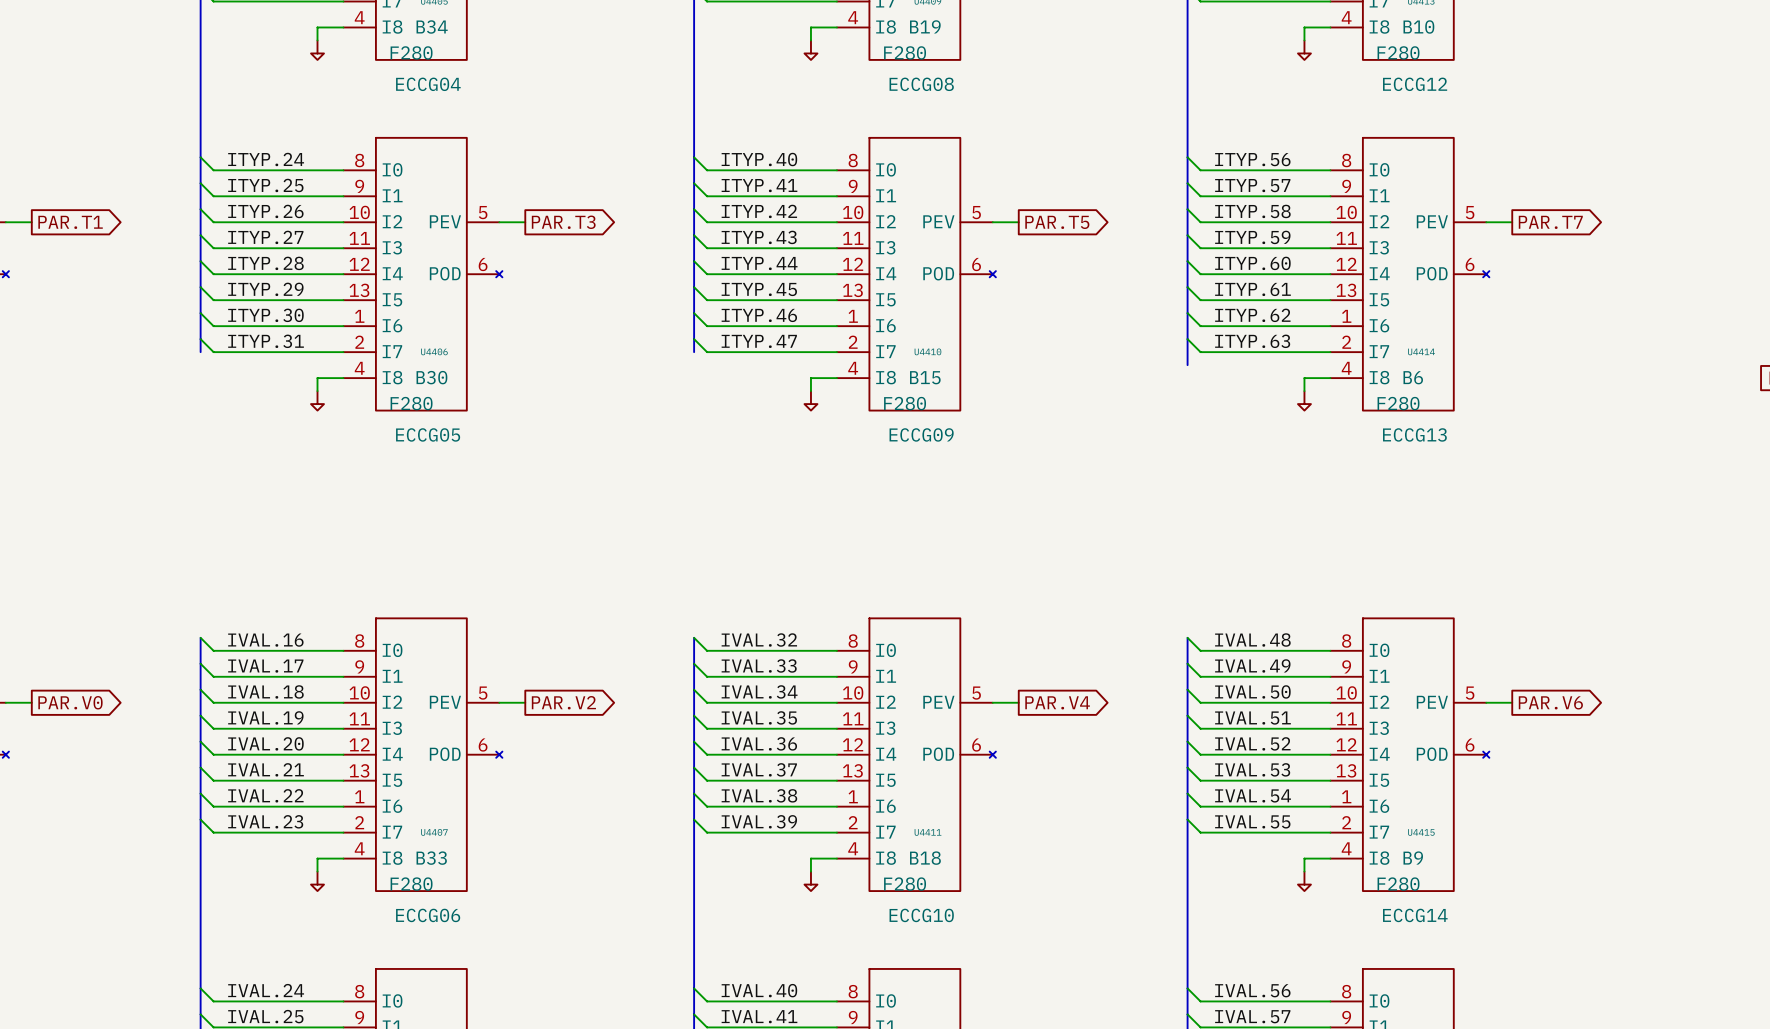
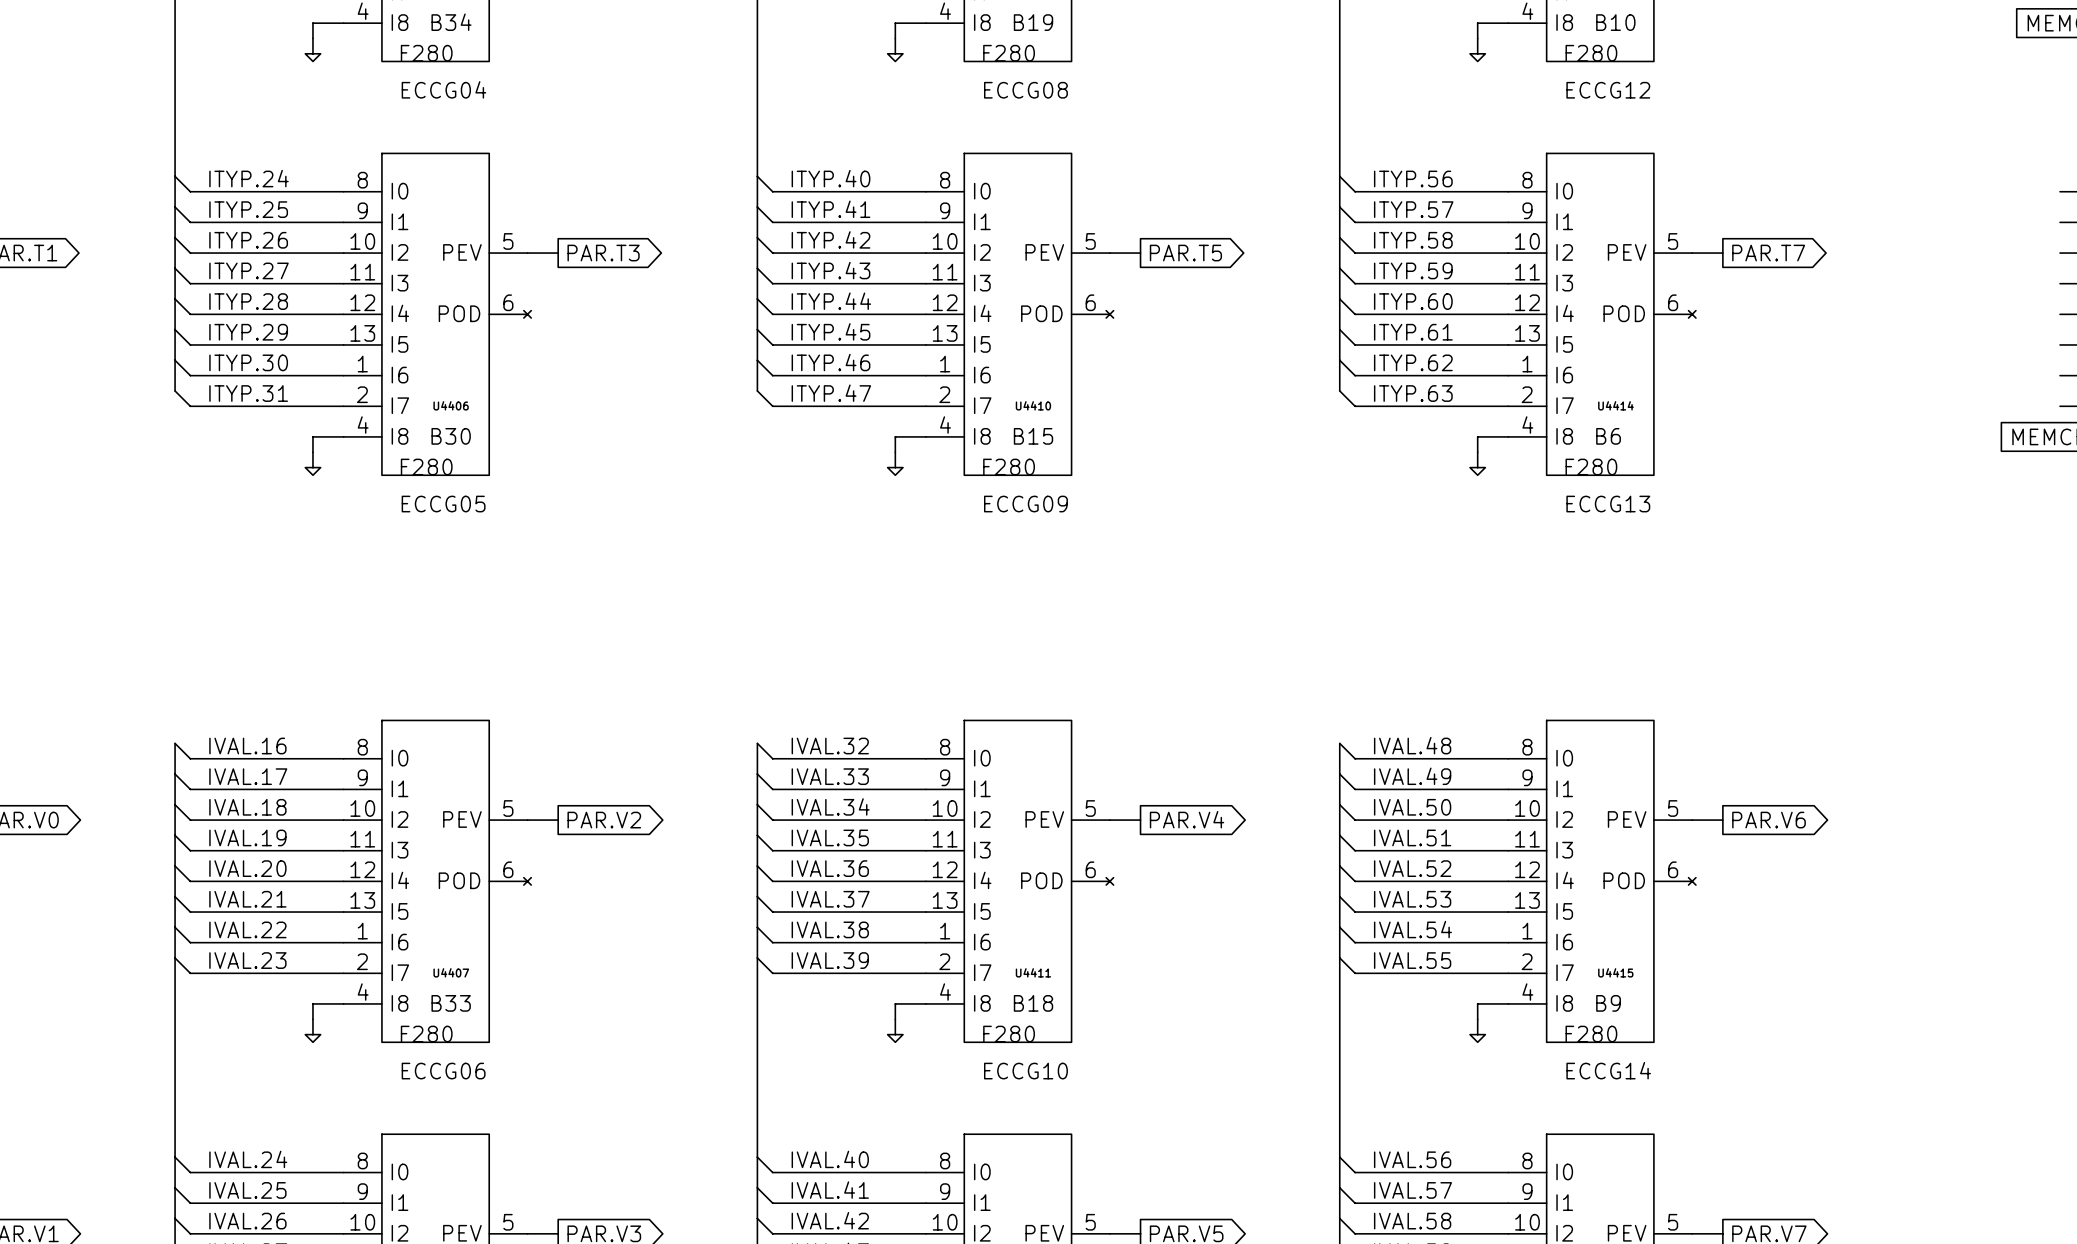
bus: (200, 339) (200, 352) -> none
bus: (694, 339) (694, 352) -> none
bus: (1187, 339) (1187, 365) -> none

